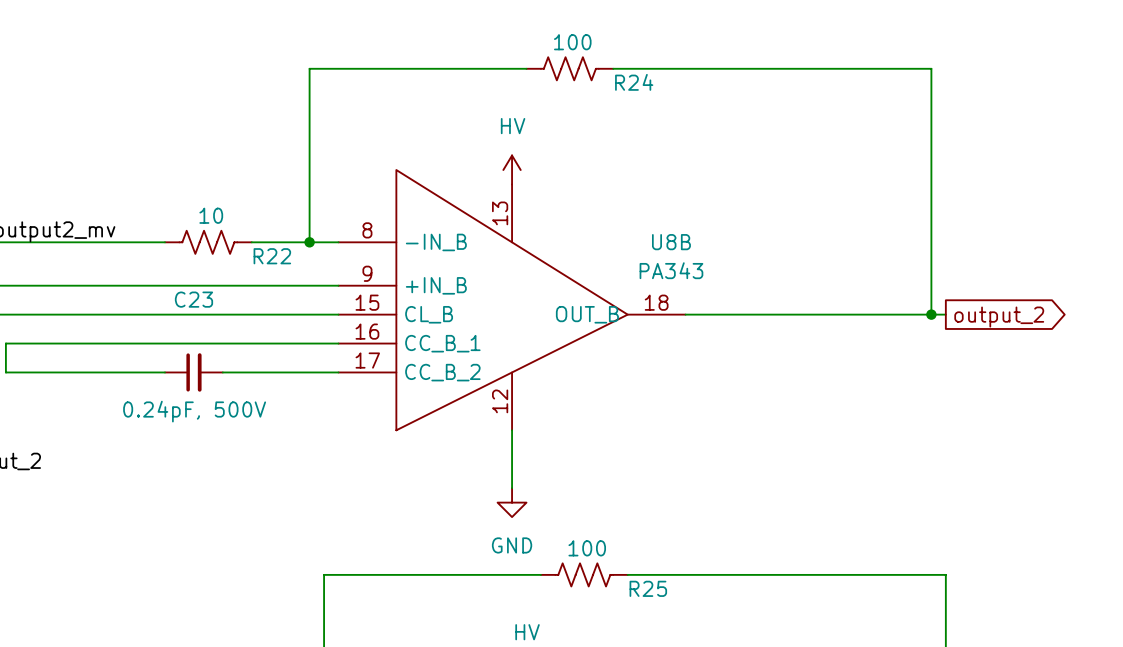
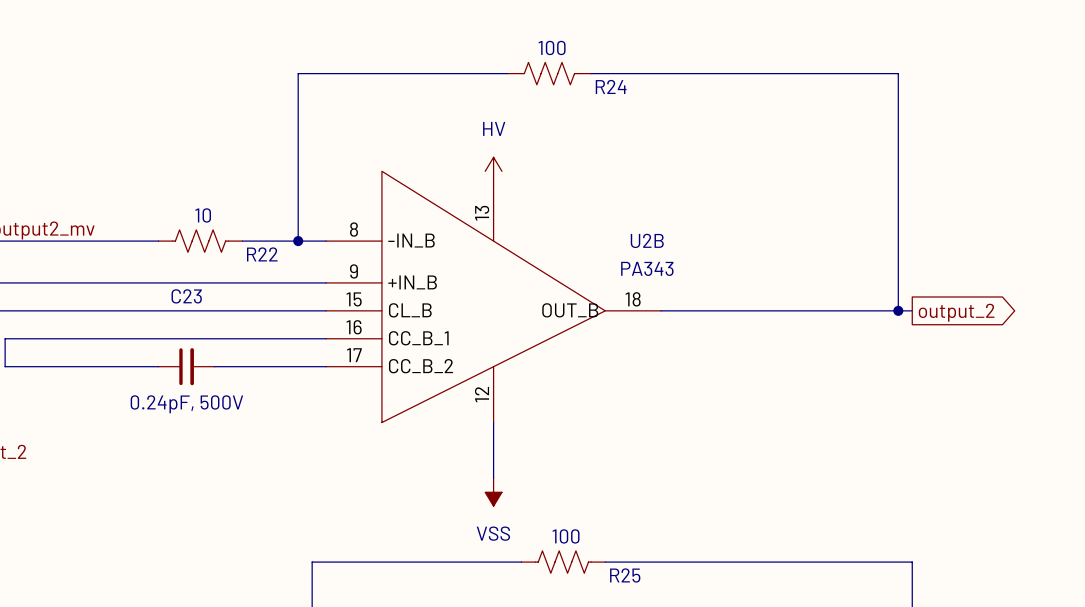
U8B name: U8B (671, 242) -> U2B (647, 240)
power symbol: GND (512, 502) -> VSS (493, 492)

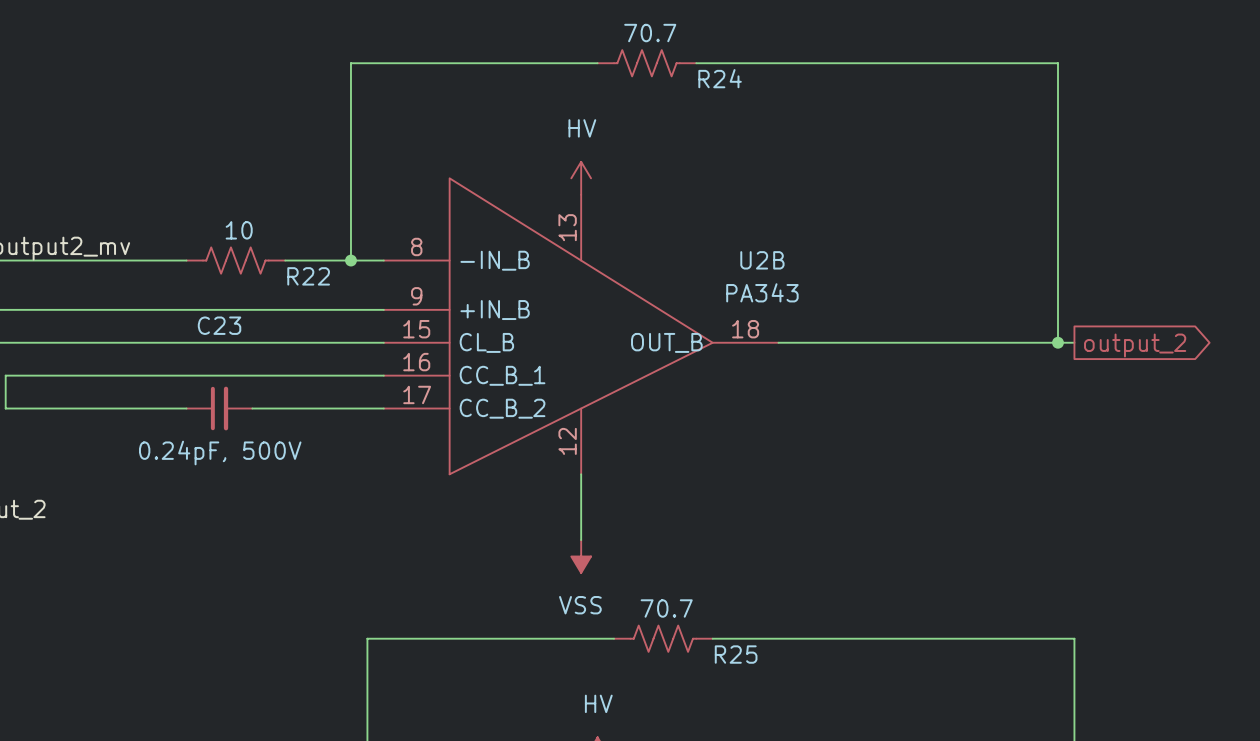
R24 value: 100 (552, 47) -> 70.7 (650, 33)
R25 value: 100 (566, 536) -> 70.7 (666, 608)

